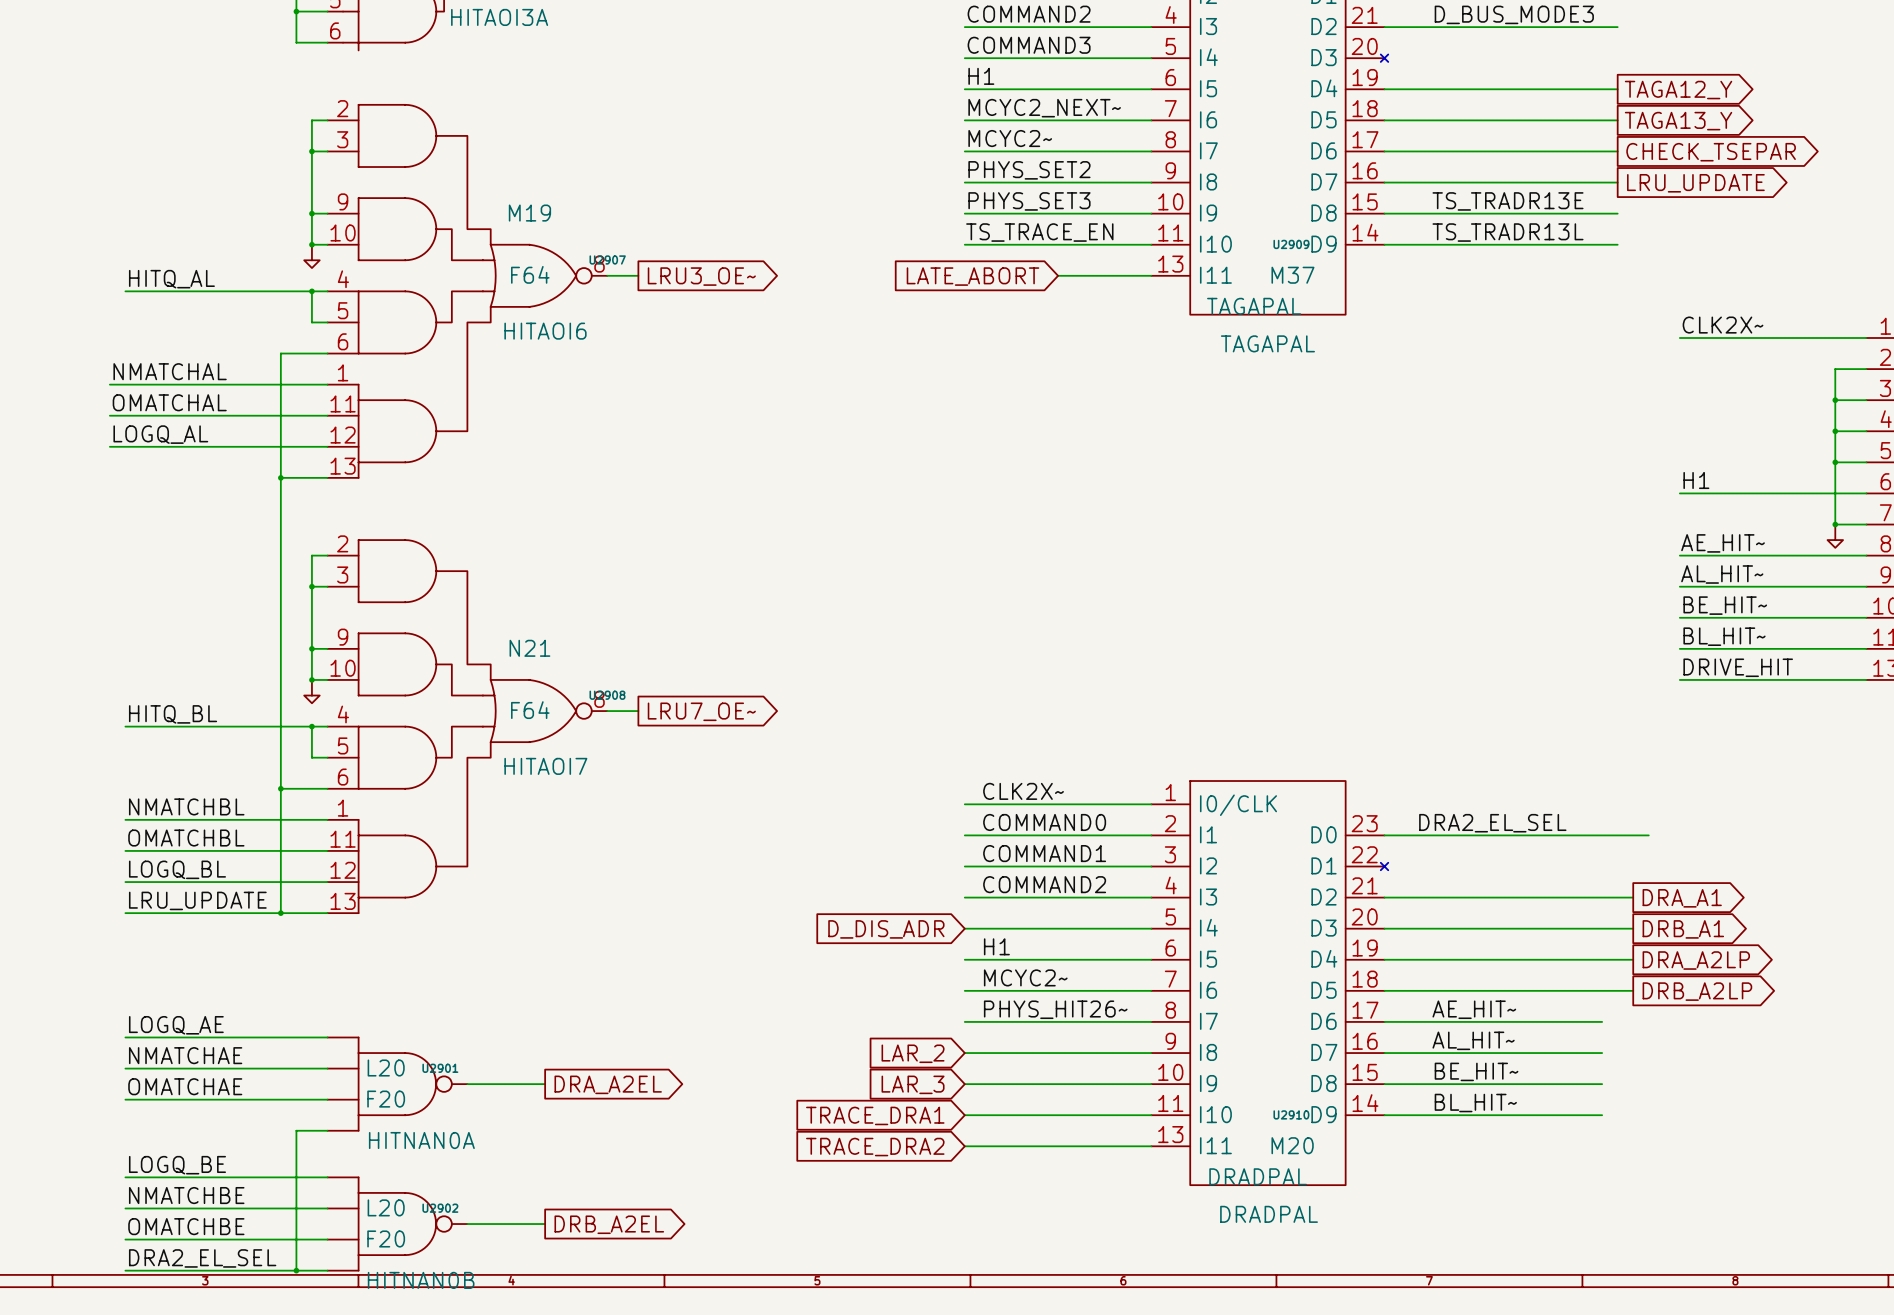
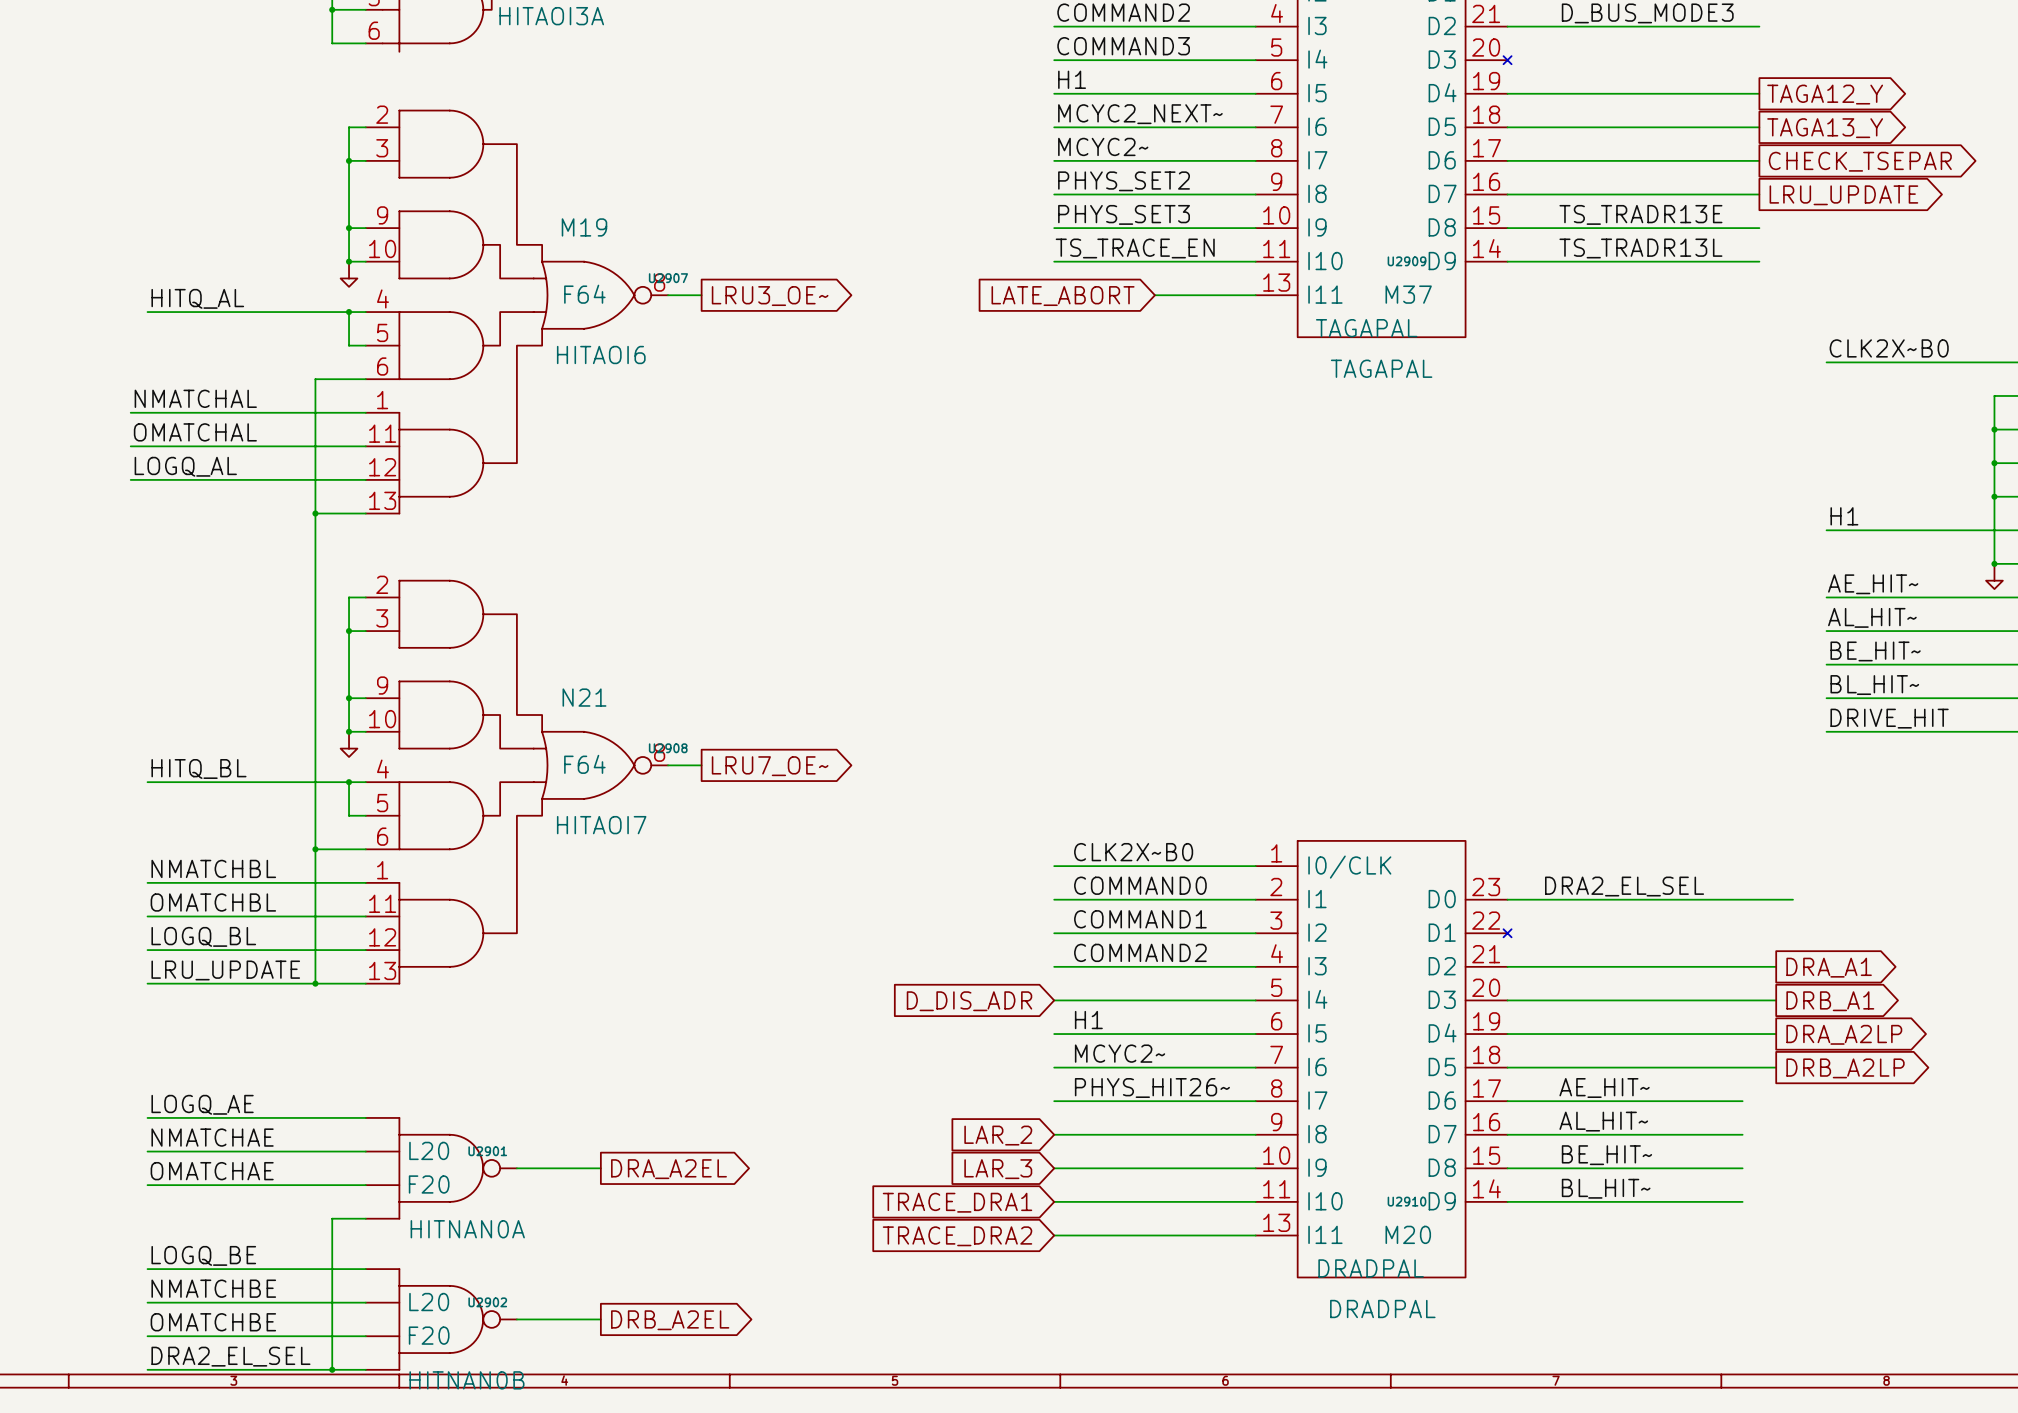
label: CLK2X~ (1723, 325) -> CLK2X~B0 (1889, 348)
label: CLK2X~ (1023, 791) -> CLK2X~B0 (1133, 852)

